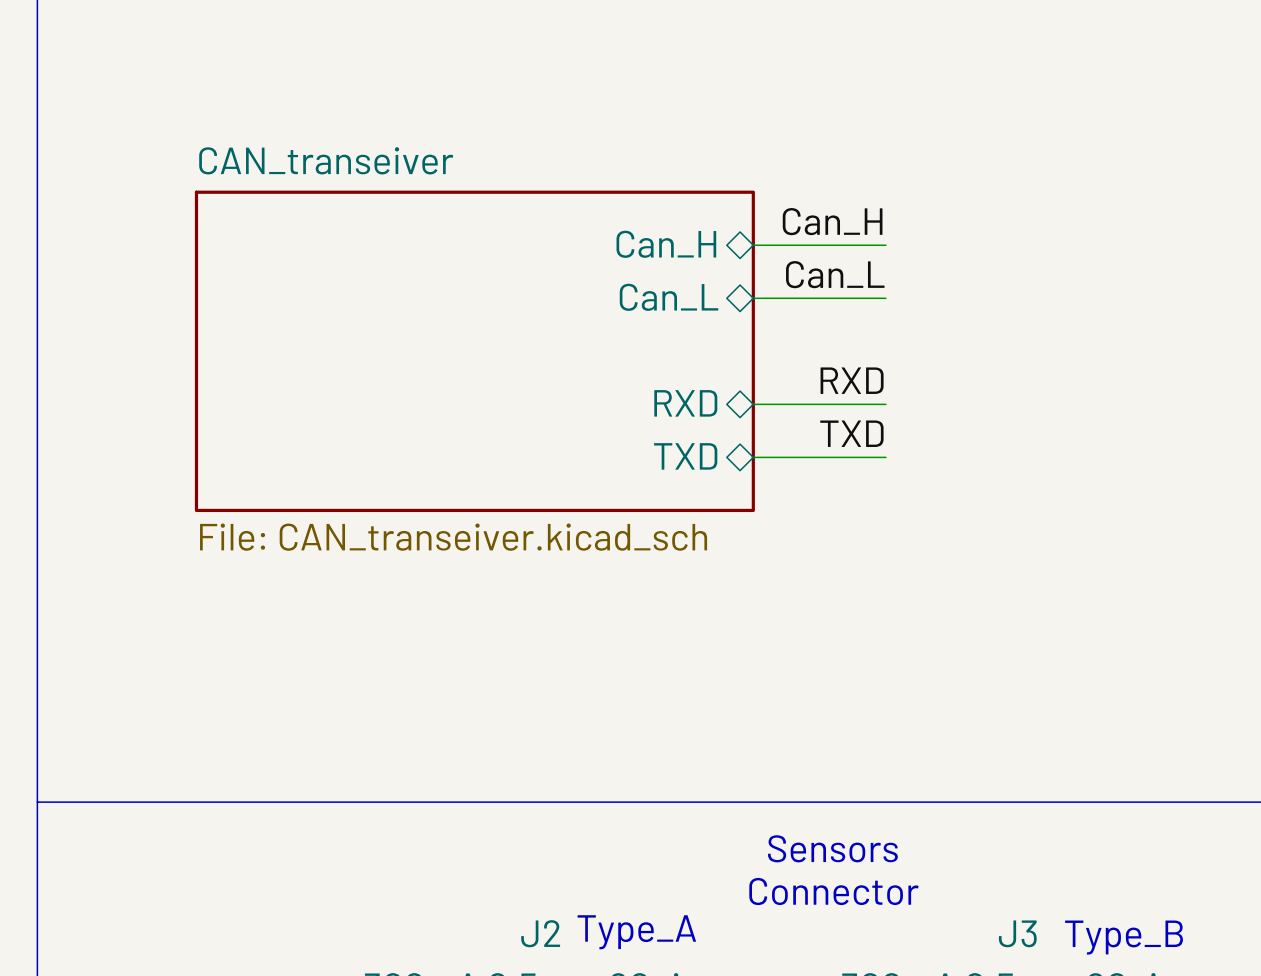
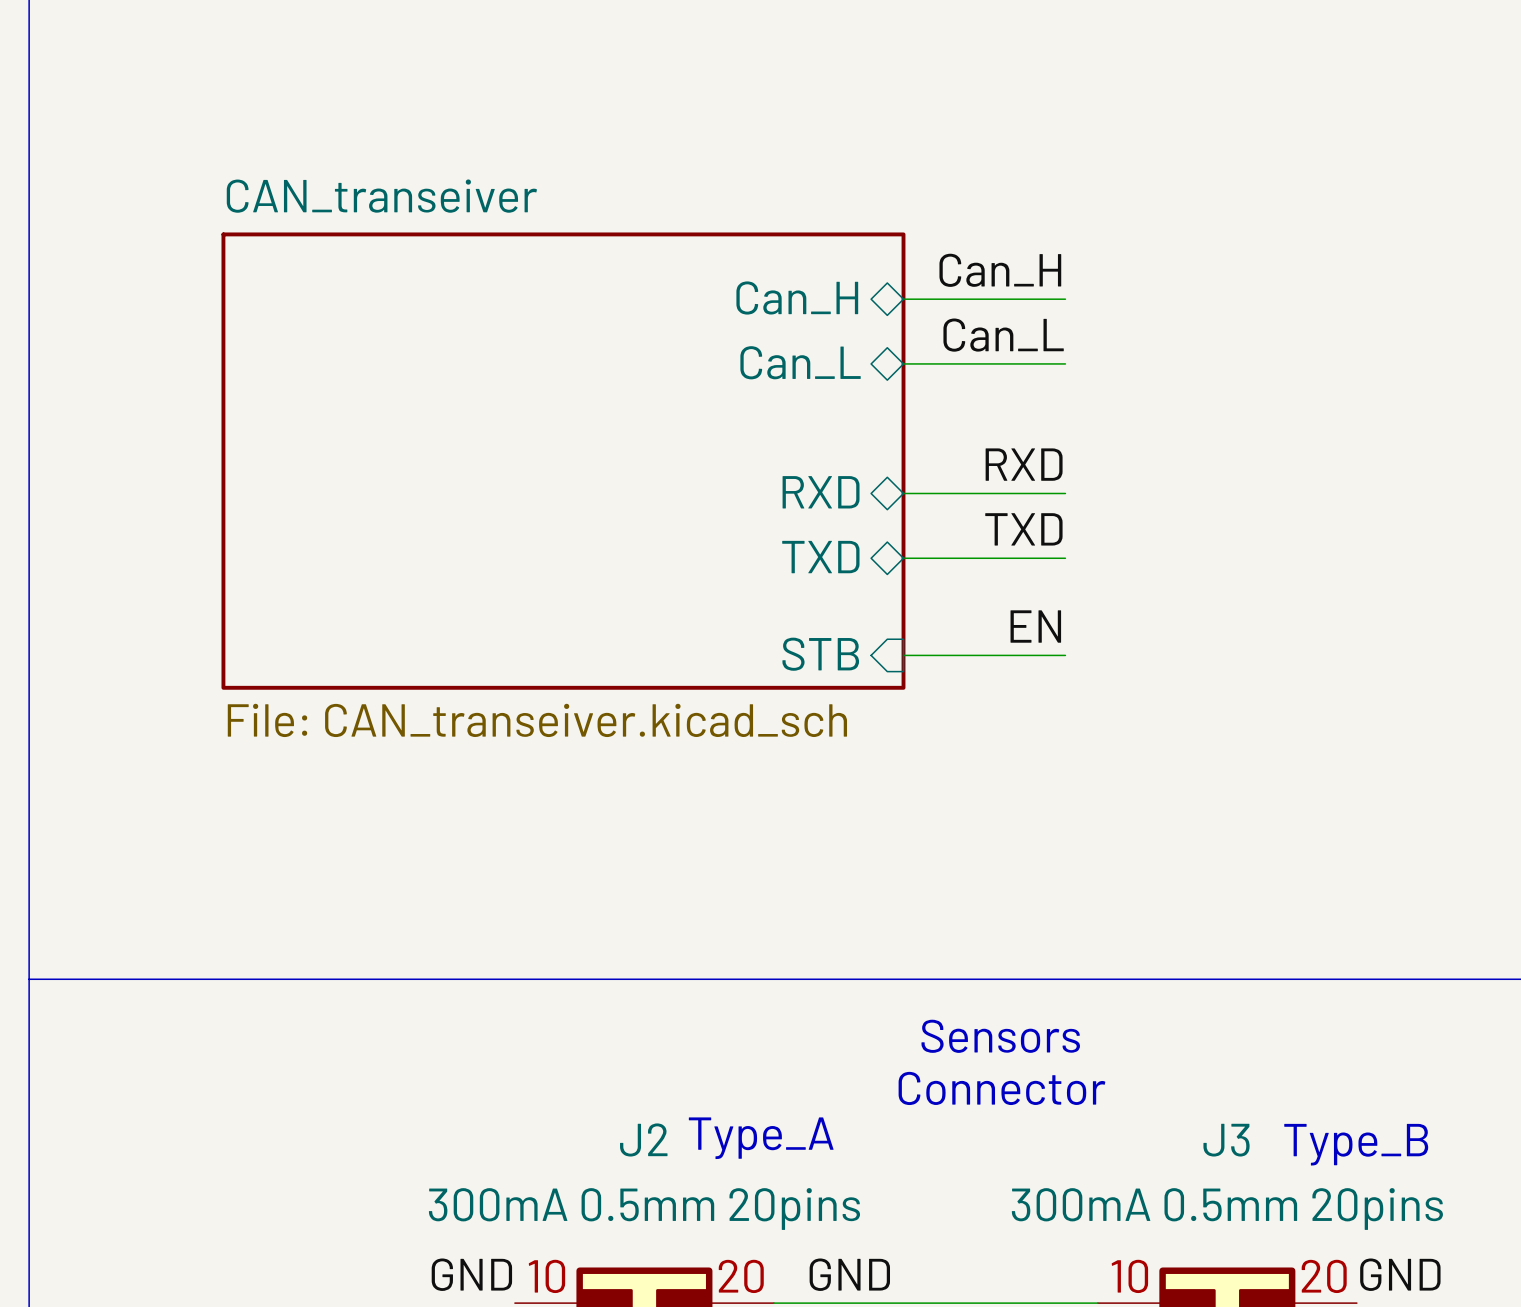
sheet CAN_transeiver: File: CAN_transeiver.kicad_sch (474, 351) -> none
sheet CAN_transeiver: none -> File: CAN_transeiver.kicad_sch (563, 461)
label: none -> EN (1035, 626)
sheet pin: none -> STB (820, 654)
wire: none -> (903, 655) (1065, 655)

